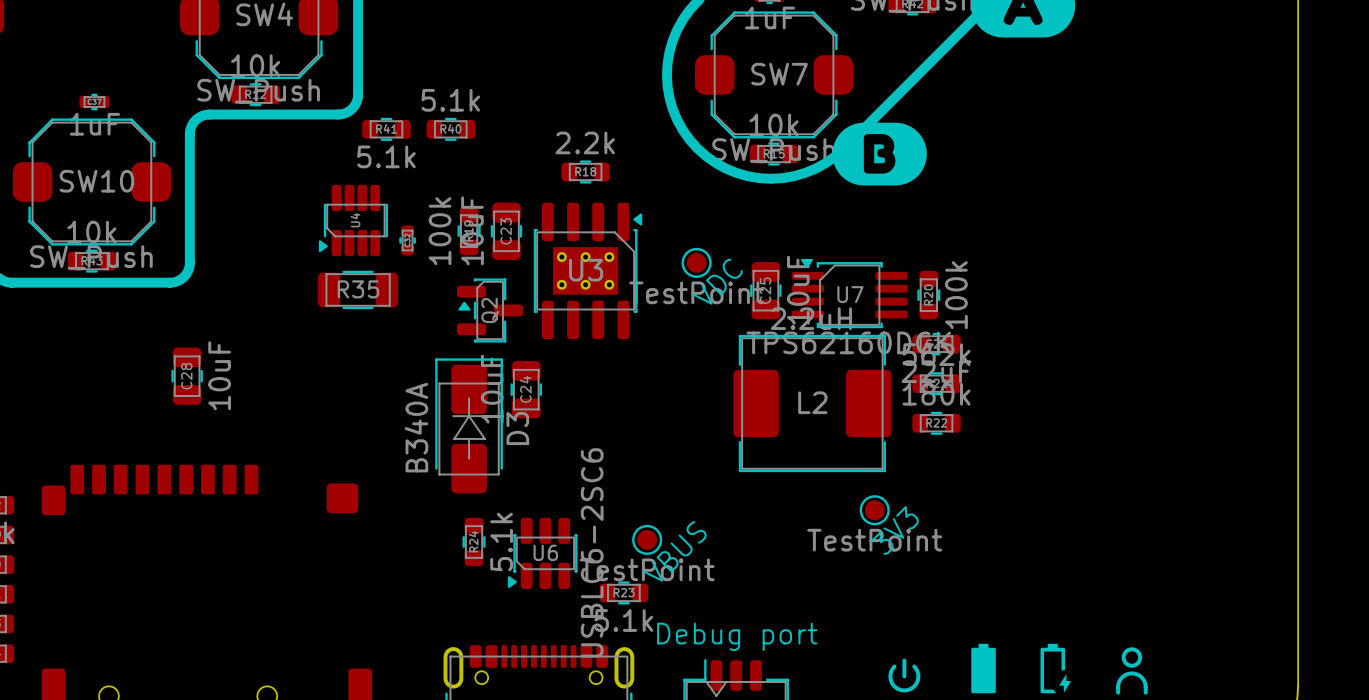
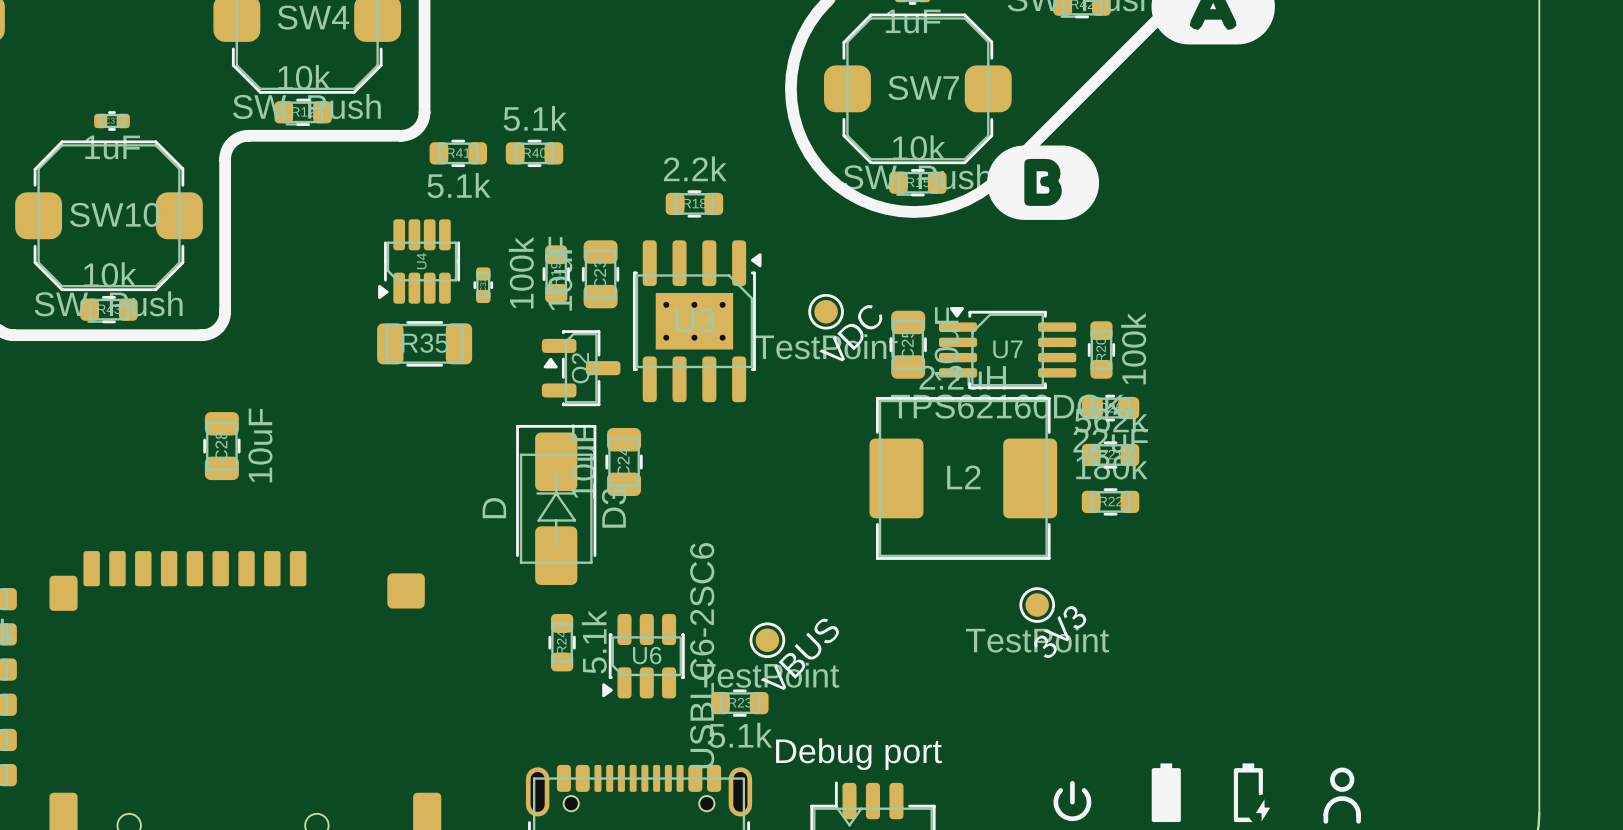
D3 value: B340A (416, 427) -> D (494, 508)

